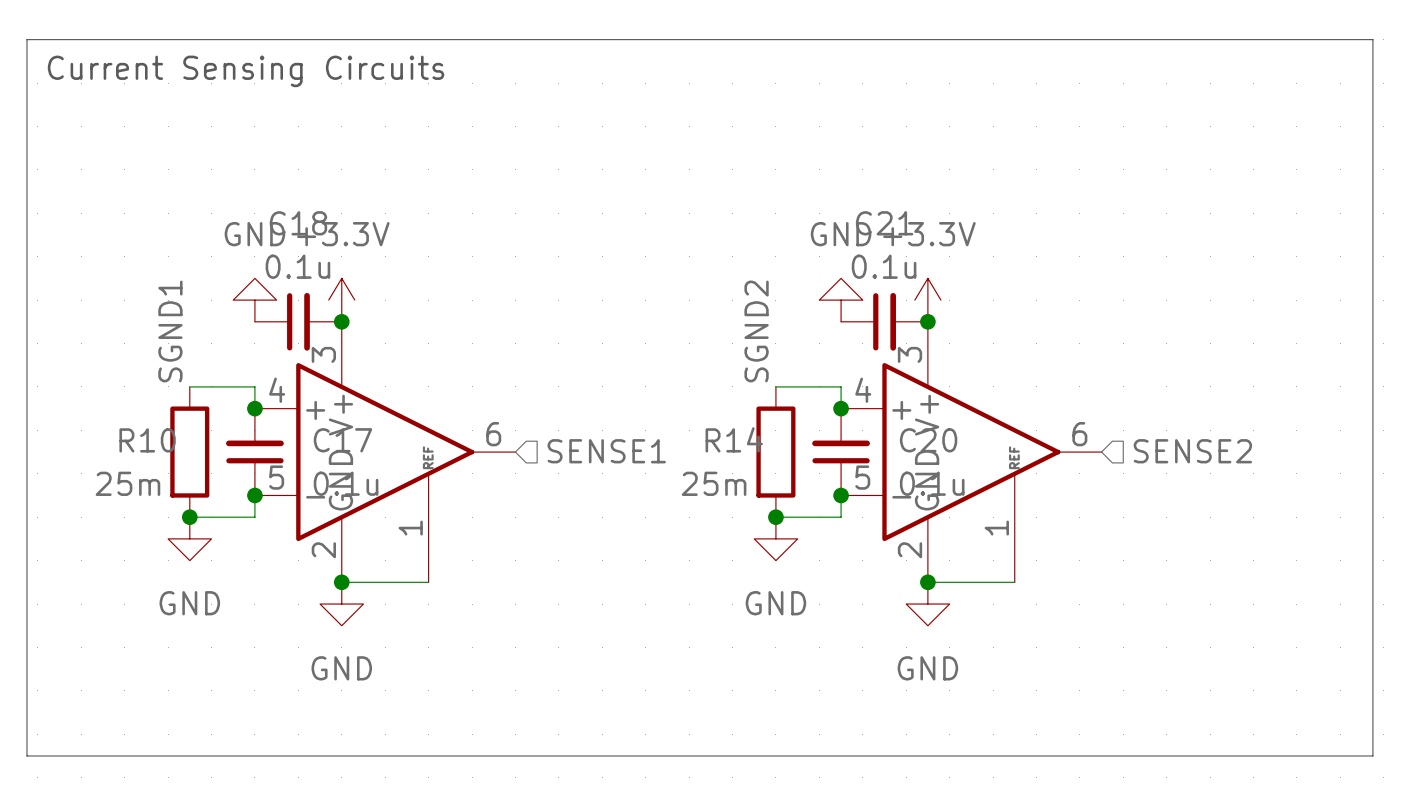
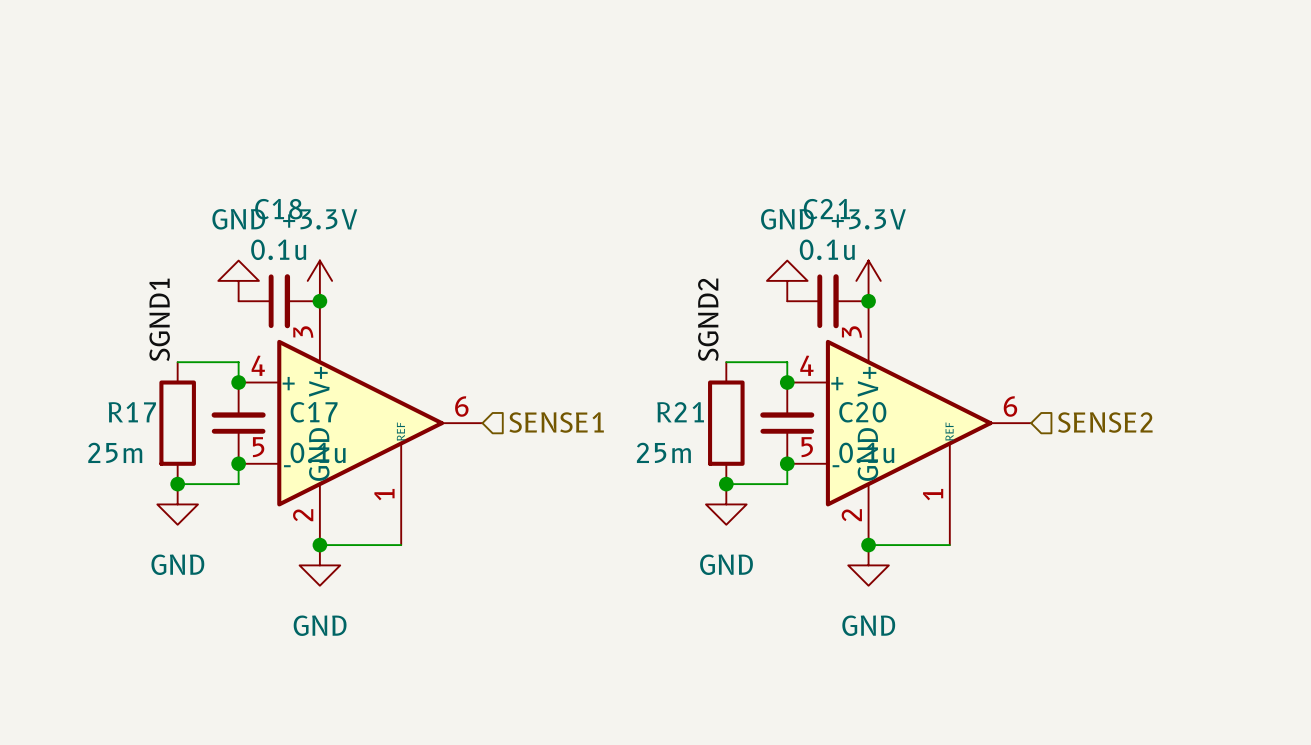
line: (26, 39) (1372, 39) (1372, 755) (26, 755) (26, 39) -> none
text: Current Sensing Circuits (246, 71) -> none
R14 name: R14 (734, 439) -> R21 (680, 412)
R10 name: R10 (147, 440) -> R17 (132, 412)

